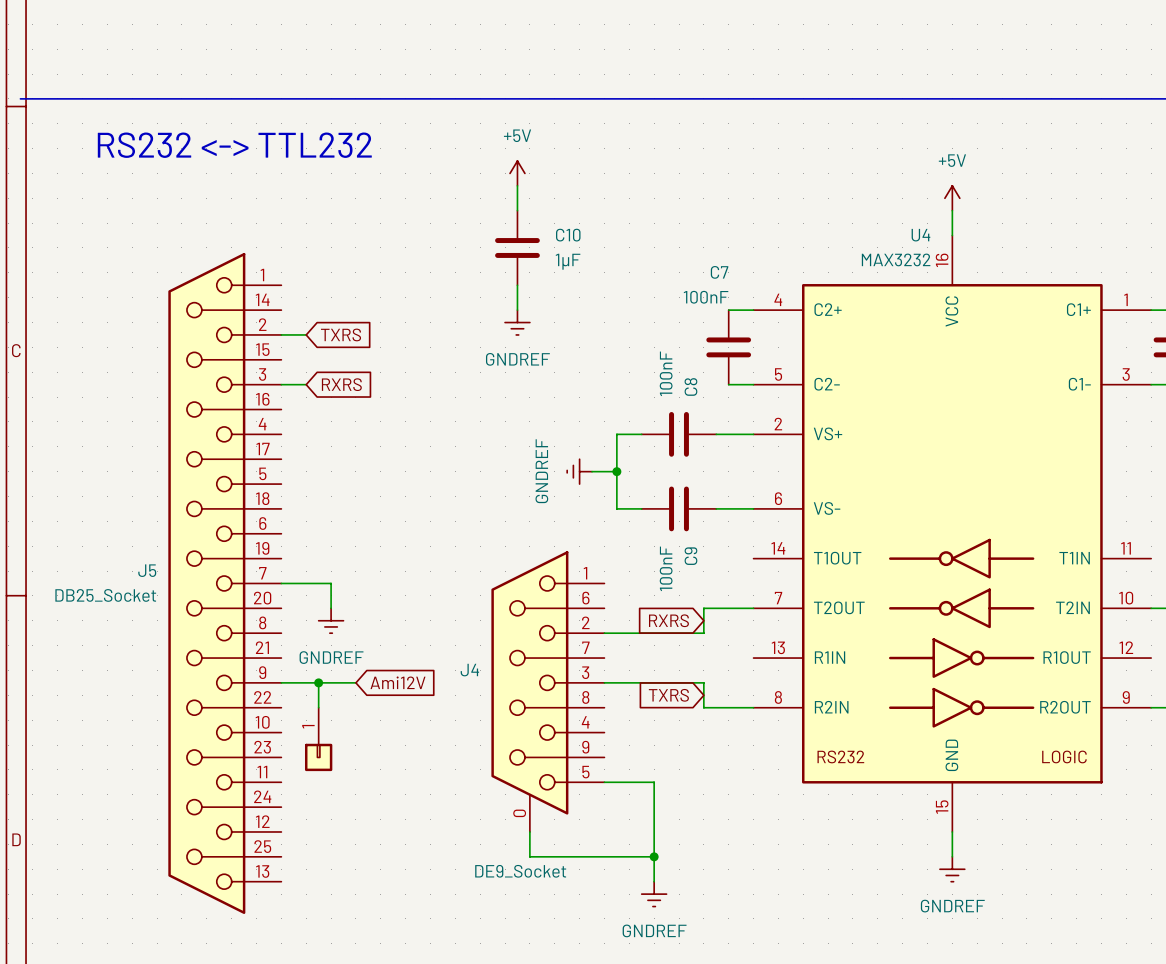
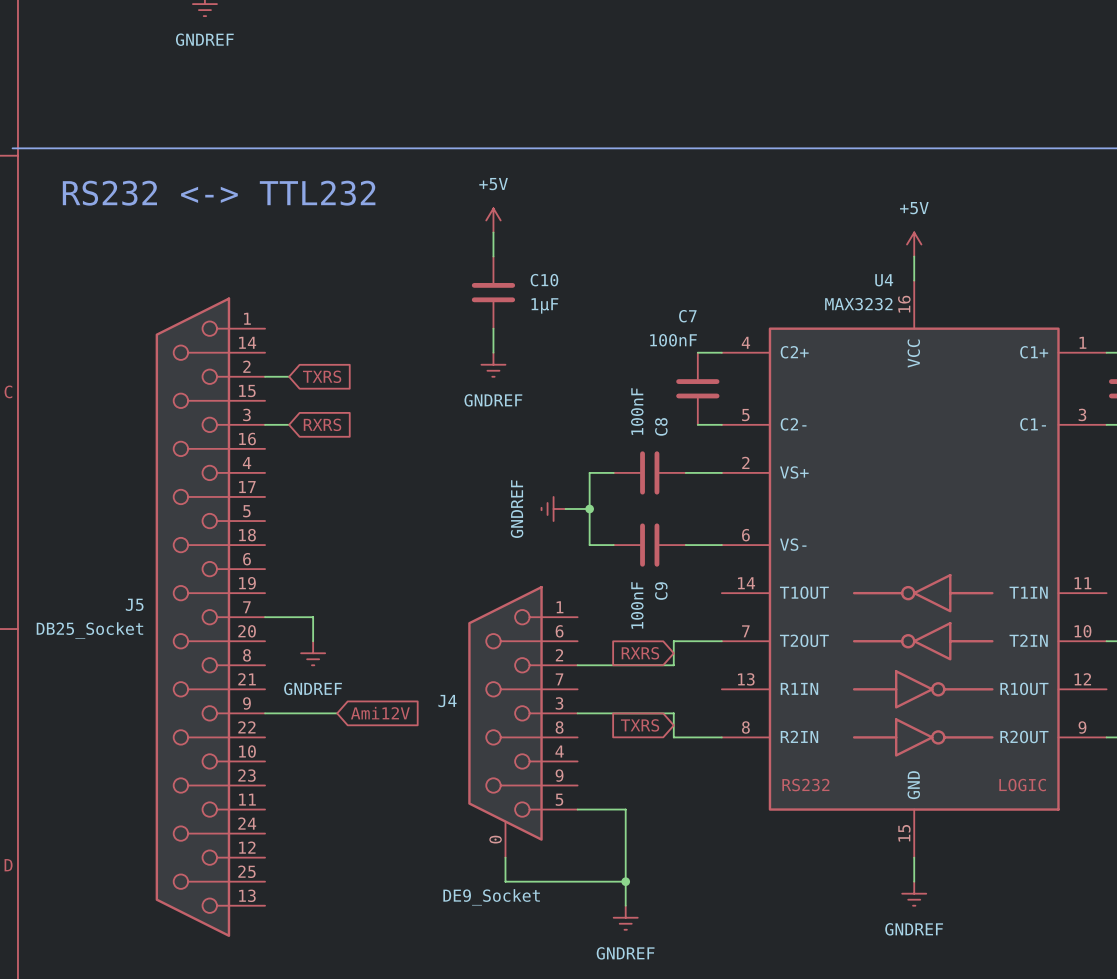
wire: (318, 682) (318, 707) -> none
junction: (318, 682) -> none
part: (318, 739) -> none

